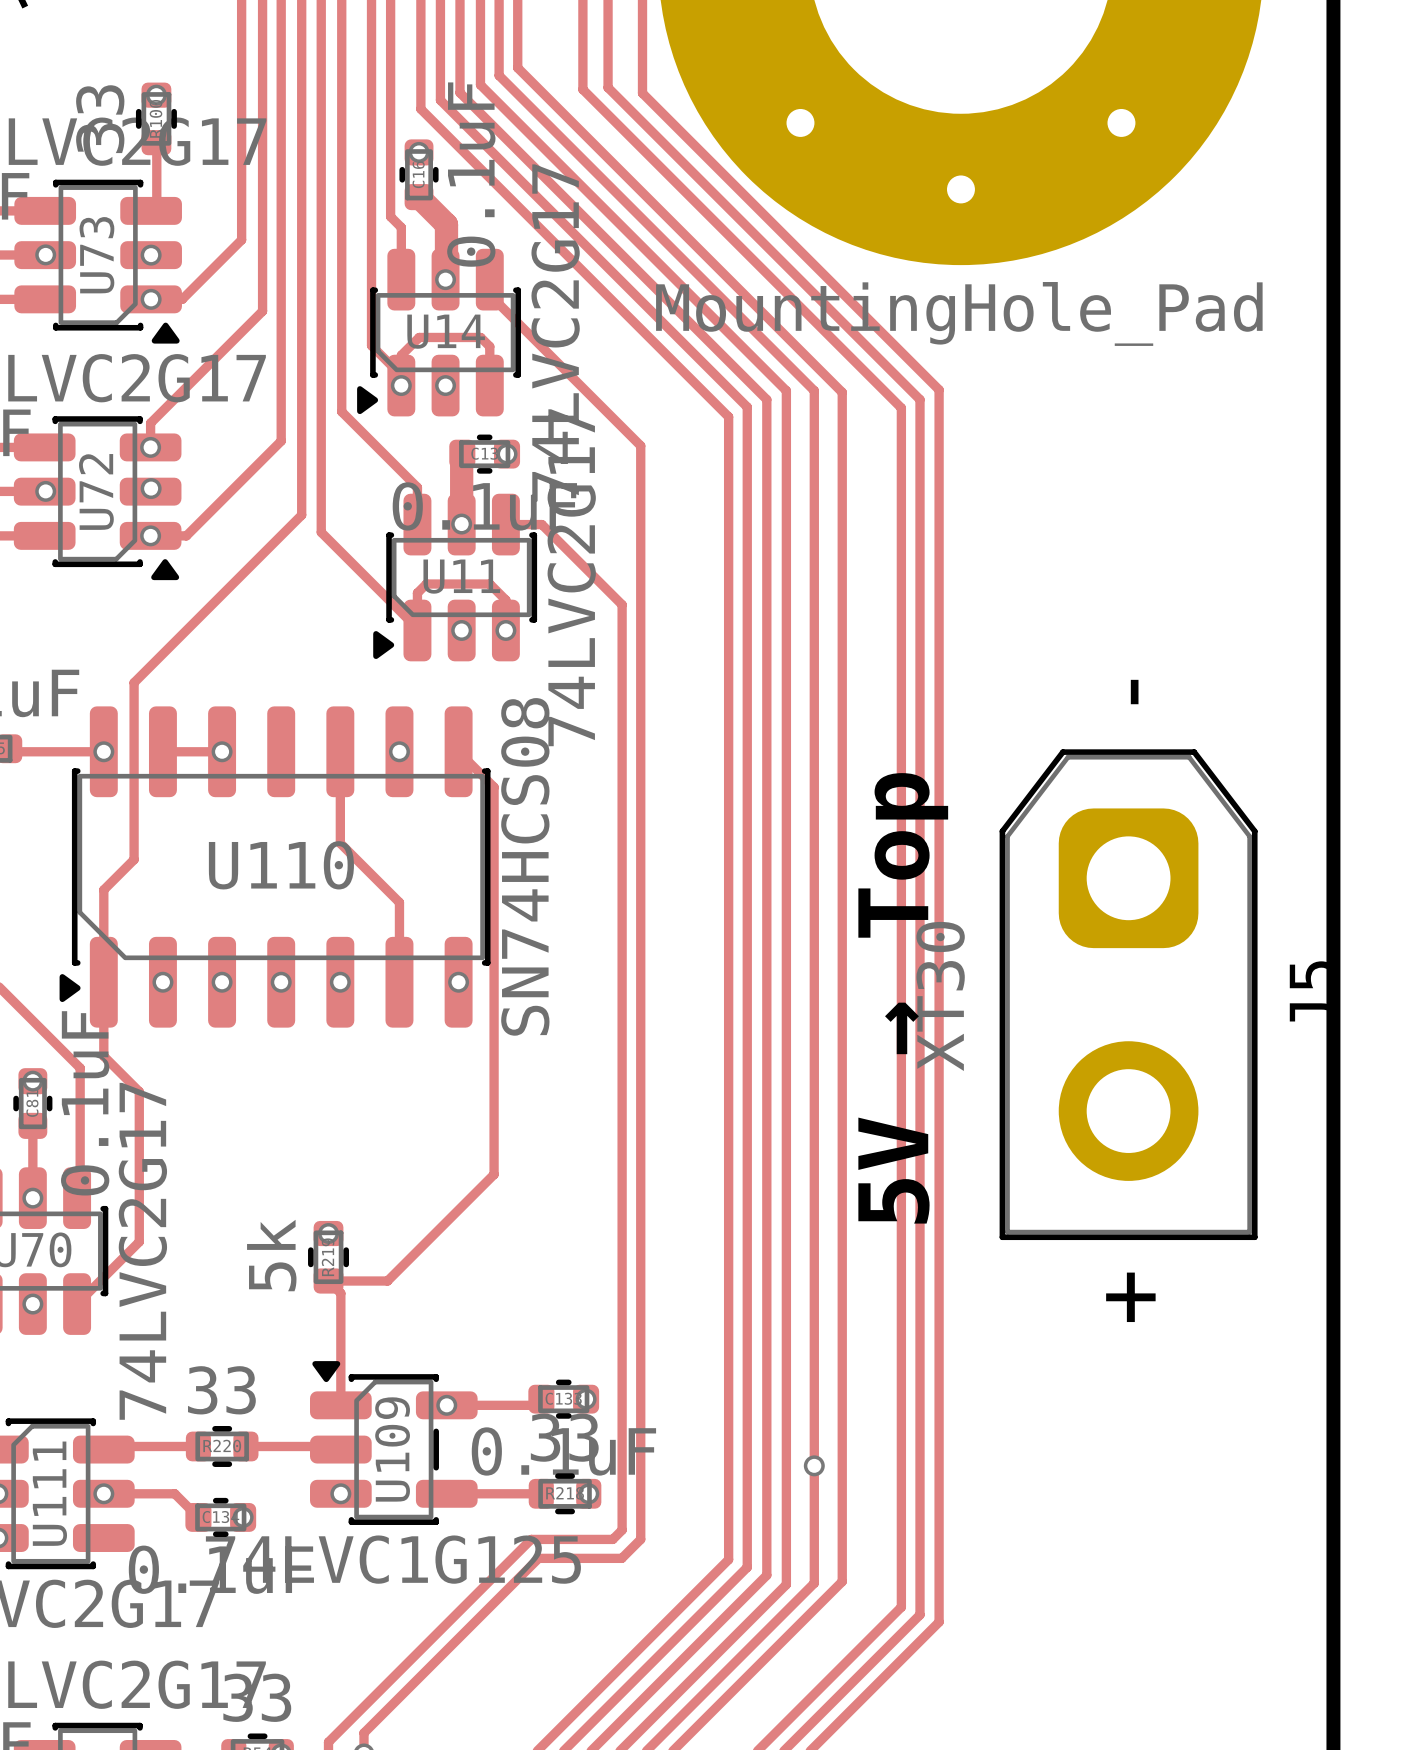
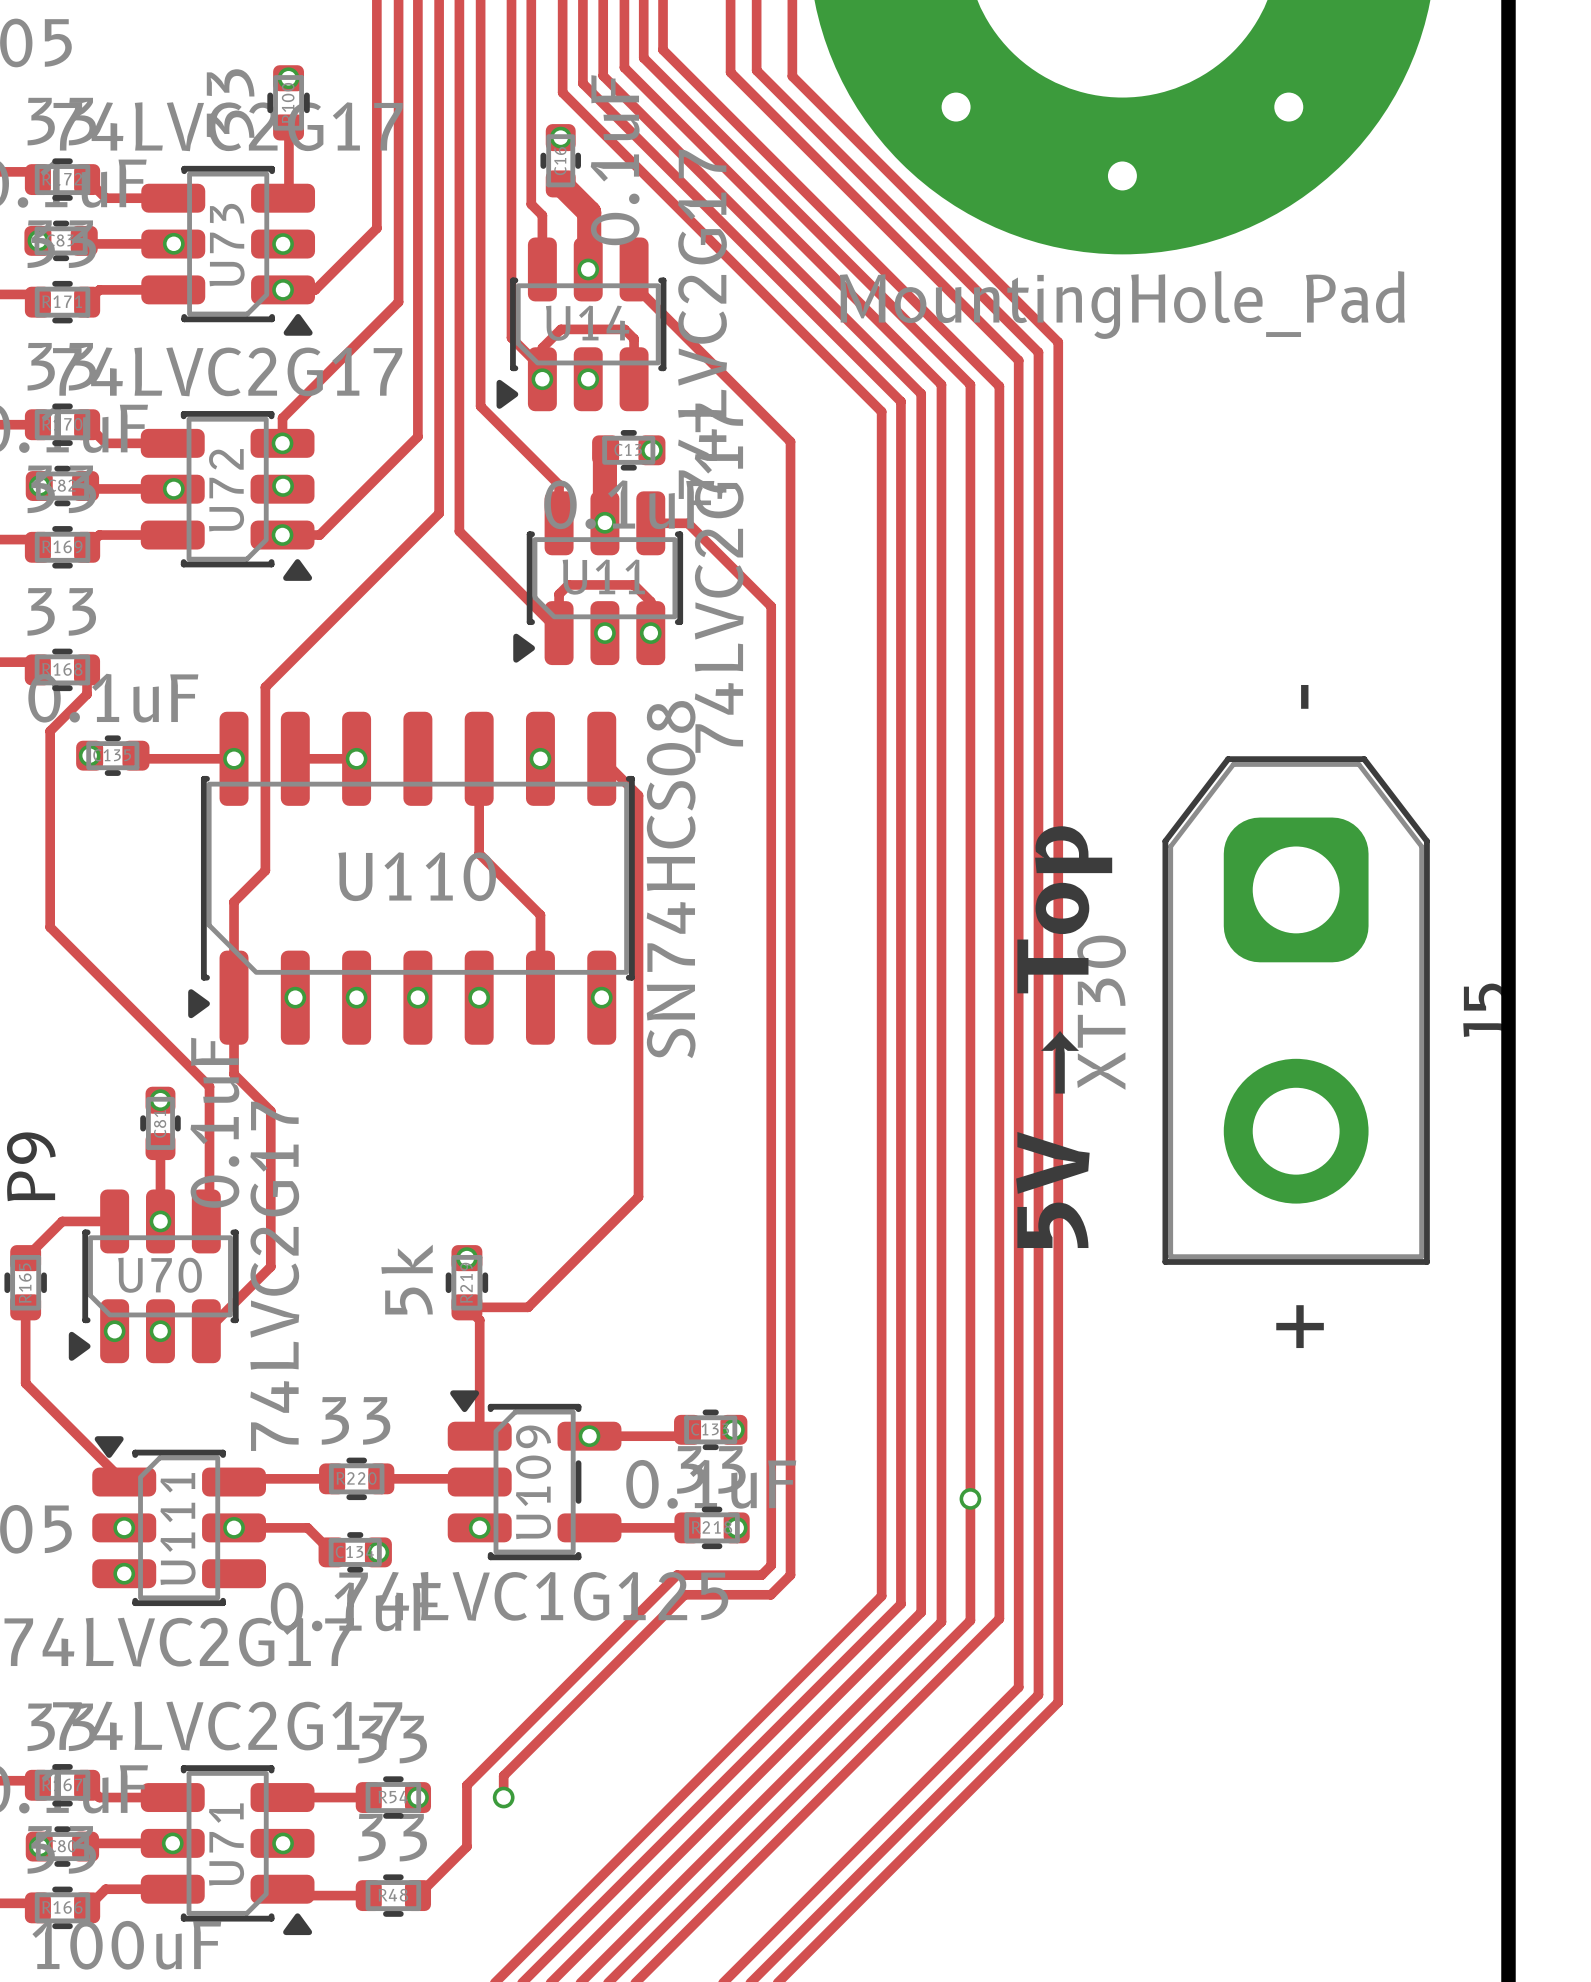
track: (899, 349) (939, 389) (939, 1622) (899, 1662) -> (1058, 342) (1058, 1702)
track: (879, 359) (920, 399) (920, 1614) (879, 1654) -> (1038, 352) (1038, 1694)
track: (860, 367) (901, 408) (901, 1607) (860, 1647) -> (1018, 360) (1018, 1687)

